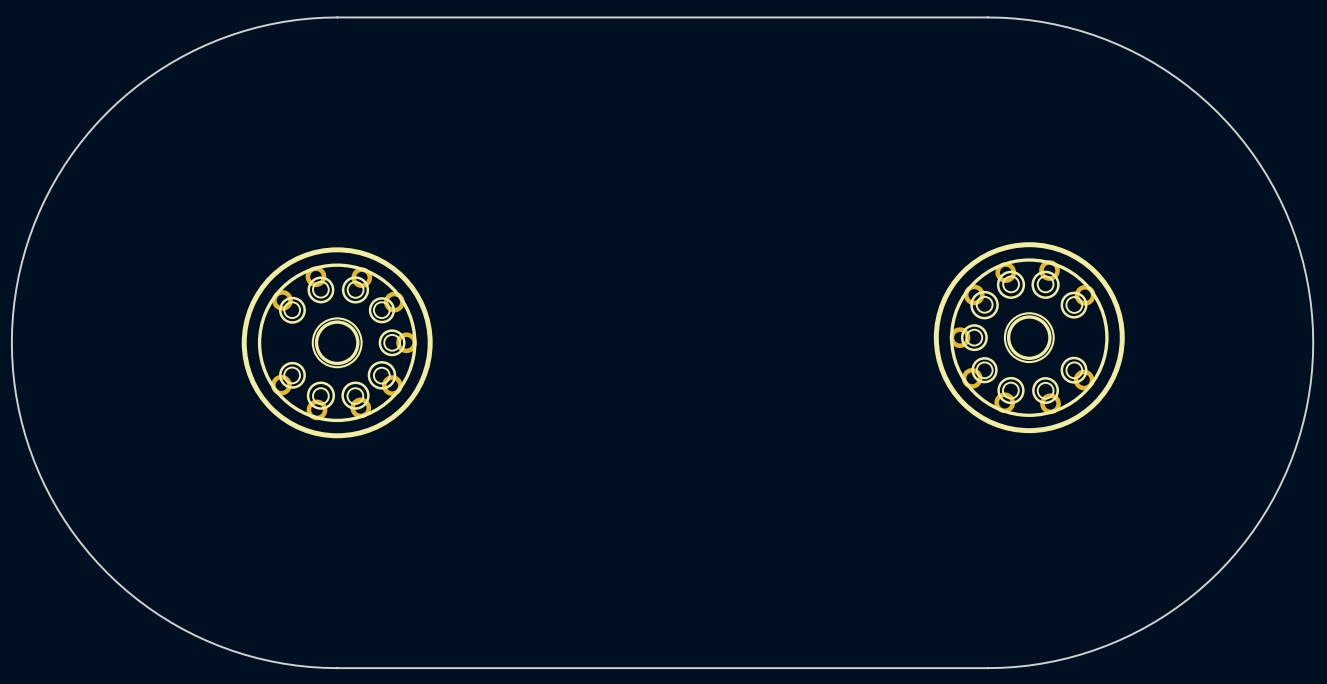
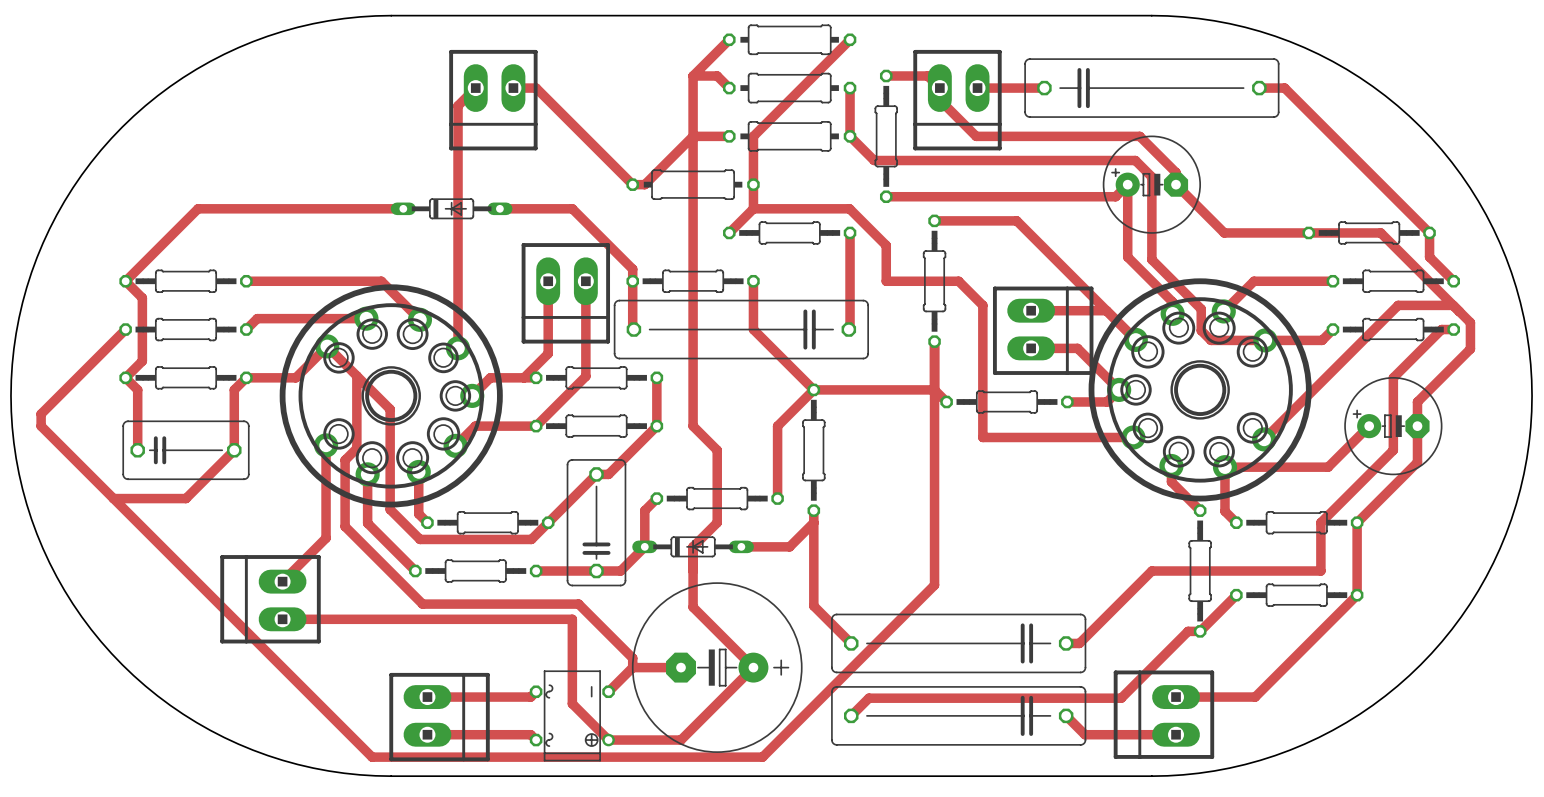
track: none -> (729, 39) (693, 76)
part: none -> (789, 39)
track: none -> (850, 39) (753, 136) (753, 208)
track: none -> (693, 76) (717, 76) (729, 88)
track: none -> (693, 76) (693, 426) (717, 450) (717, 522) (693, 546) (693, 607) (753, 667) (681, 740) (608, 740) (572, 703) (572, 619) (282, 619)
track: none -> (886, 76) (927, 76) (939, 88) (939, 100) (976, 136) (1139, 136) (1176, 172) (1176, 184) (1224, 232) (1380, 232) (1470, 322) (1470, 349) (1417, 401) (1417, 462) (1357, 522) (1357, 595) (1255, 697) (1176, 697)
track: none -> (475, 88) (458, 105) (458, 348)
track: none -> (513, 88) (536, 88) (632, 184) (644, 184) (693, 136) (729, 136)
part: none -> (789, 88)
track: none -> (850, 88) (850, 136) (874, 160) (1135, 160) (1151, 176) (1151, 259) (1201, 309) (1201, 330) (1211, 340) (1322, 340) (1332, 329)
track: none -> (977, 88) (1044, 88)
part: none -> (1151, 88)
track: none -> (1259, 88) (1284, 88) (1429, 232) (1429, 257) (1453, 281)
part: none -> (493, 100)
part: none -> (957, 100)
part: none -> (789, 136)
part: none -> (886, 136)
part: none -> (693, 184)
part: none -> (1151, 184)
track: none -> (886, 196) (1115, 196) (1127, 184) (1127, 257) (1172, 302) (1172, 313)
track: none -> (403, 208) (198, 208) (125, 281) (142, 297) (142, 361) (125, 377) (137, 389) (137, 450)
part: none -> (451, 208)
track: none -> (499, 208) (572, 208) (632, 269) (633, 329)
track: none -> (753, 208) (849, 208) (886, 245) (886, 281) (958, 281) (982, 305) (982, 437) (1133, 437)
track: none -> (753, 208) (729, 232)
track: none -> (934, 220) (1016, 220) (1135, 339)
part: none -> (789, 232)
track: none -> (850, 232) (848, 329)
part: none -> (1369, 232)
part: none -> (186, 281)
track: none -> (246, 281) (381, 281) (419, 319)
track: none -> (548, 281) (548, 353) (524, 377)
track: none -> (585, 281) (585, 376) (536, 426) (475, 426) (455, 445)
part: none -> (693, 281)
track: none -> (753, 281) (753, 329) (813, 389)
part: none -> (934, 281)
track: none -> (1332, 281) (1253, 281) (1223, 311)
part: none -> (1393, 281)
part: none -> (565, 293)
track: none -> (1453, 305) (1398, 305) (1264, 439)
track: none -> (1031, 310) (1106, 310)
track: none -> (366, 318) (257, 318) (246, 329)
track: none -> (125, 329) (41, 414) (41, 426) (372, 757) (762, 757) (934, 585) (934, 341)
part: none -> (186, 329)
part: none -> (741, 329)
part: none -> (1393, 329)
track: none -> (1453, 329) (1441, 329) (1393, 377) (1393, 450) (1320, 522) (1320, 571) (1151, 571) (1079, 643) (1066, 643)
part: none -> (1043, 330)
track: none -> (1031, 348) (1077, 348) (1119, 389) (1107, 401) (1067, 401)
track: none -> (356, 376) (356, 448) (345, 460) (345, 526) (422, 604) (578, 604) (632, 658) (632, 667)
part: none -> (186, 377)
track: none -> (536, 377) (490, 377) (472, 395)
part: none -> (596, 377)
track: none -> (656, 377) (656, 426) (608, 474) (596, 474) (531, 539) (420, 539) (390, 509) (390, 409) (327, 346) (295, 377) (246, 377) (234, 389) (234, 450) (186, 498) (113, 498)
track: none -> (813, 389) (777, 426) (777, 498)
track: none -> (813, 389) (934, 389) (946, 401)
part: none -> (1006, 401)
part: none -> (596, 426)
track: none -> (1369, 426) (1328, 467) (1224, 467) (1224, 511) (1236, 522)
part: none -> (1393, 426)
track: none -> (326, 445) (326, 538) (282, 581)
part: none -> (186, 450)
part: none -> (813, 450)
track: none -> (1171, 466) (1171, 481) (1200, 510)
track: none -> (418, 471) (418, 514) (427, 522)
track: none -> (367, 474) (367, 523) (415, 571)
track: none -> (656, 498) (644, 510) (644, 546) (620, 571) (536, 571)
part: none -> (717, 498)
track: none -> (813, 510) (813, 606) (851, 643)
part: none -> (487, 522)
part: none -> (596, 522)
track: none -> (813, 522) (789, 546) (741, 546)
part: none -> (1296, 522)
part: none -> (693, 546)
part: none -> (475, 571)
part: none -> (1200, 571)
track: none -> (1236, 595) (1200, 631) (1188, 631) (1121, 698) (868, 698) (851, 715)
part: none -> (1296, 595)
part: none -> (270, 599)
part: none -> (958, 643)
track: none -> (632, 667) (681, 667)
track: none -> (632, 667) (608, 691)
part: none -> (717, 667)
track: none -> (536, 691) (530, 697) (427, 697)
part: none -> (1163, 714)
part: none -> (572, 715)
part: none -> (958, 715)
track: none -> (1066, 715) (1084, 734) (1176, 734)
part: none -> (439, 717)
track: none -> (427, 734) (530, 734) (536, 740)

